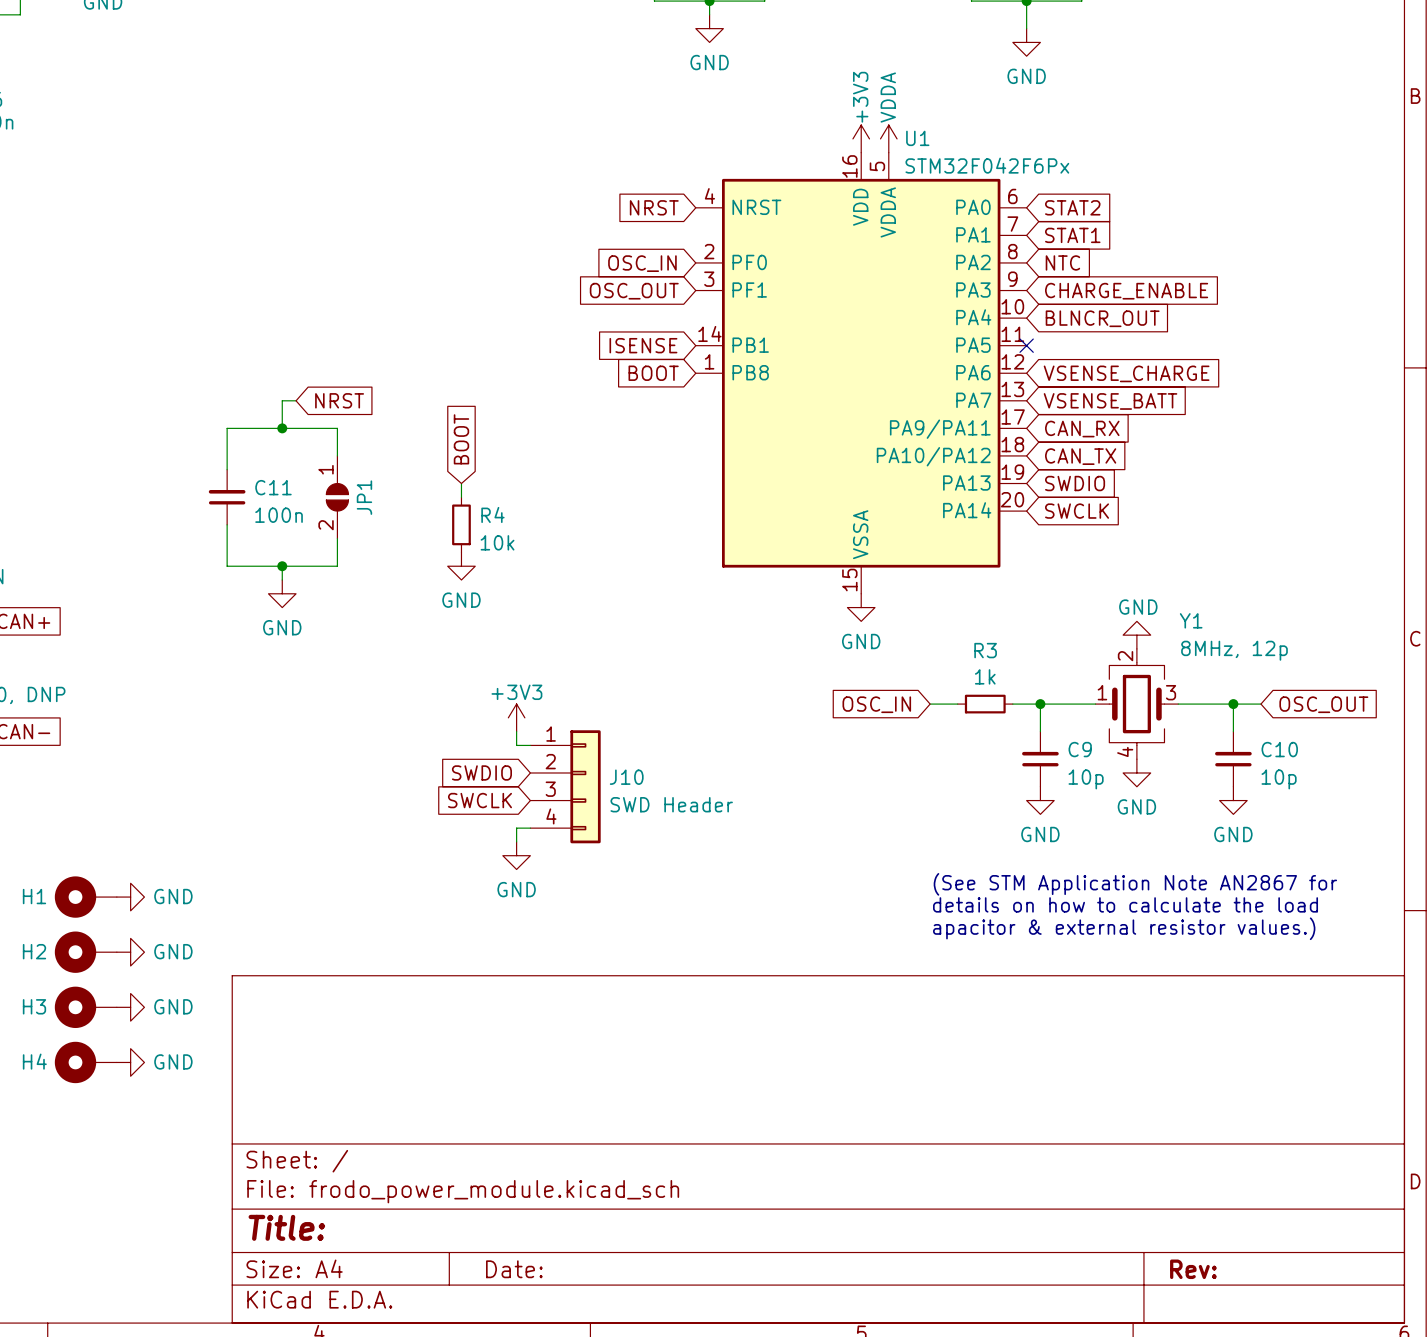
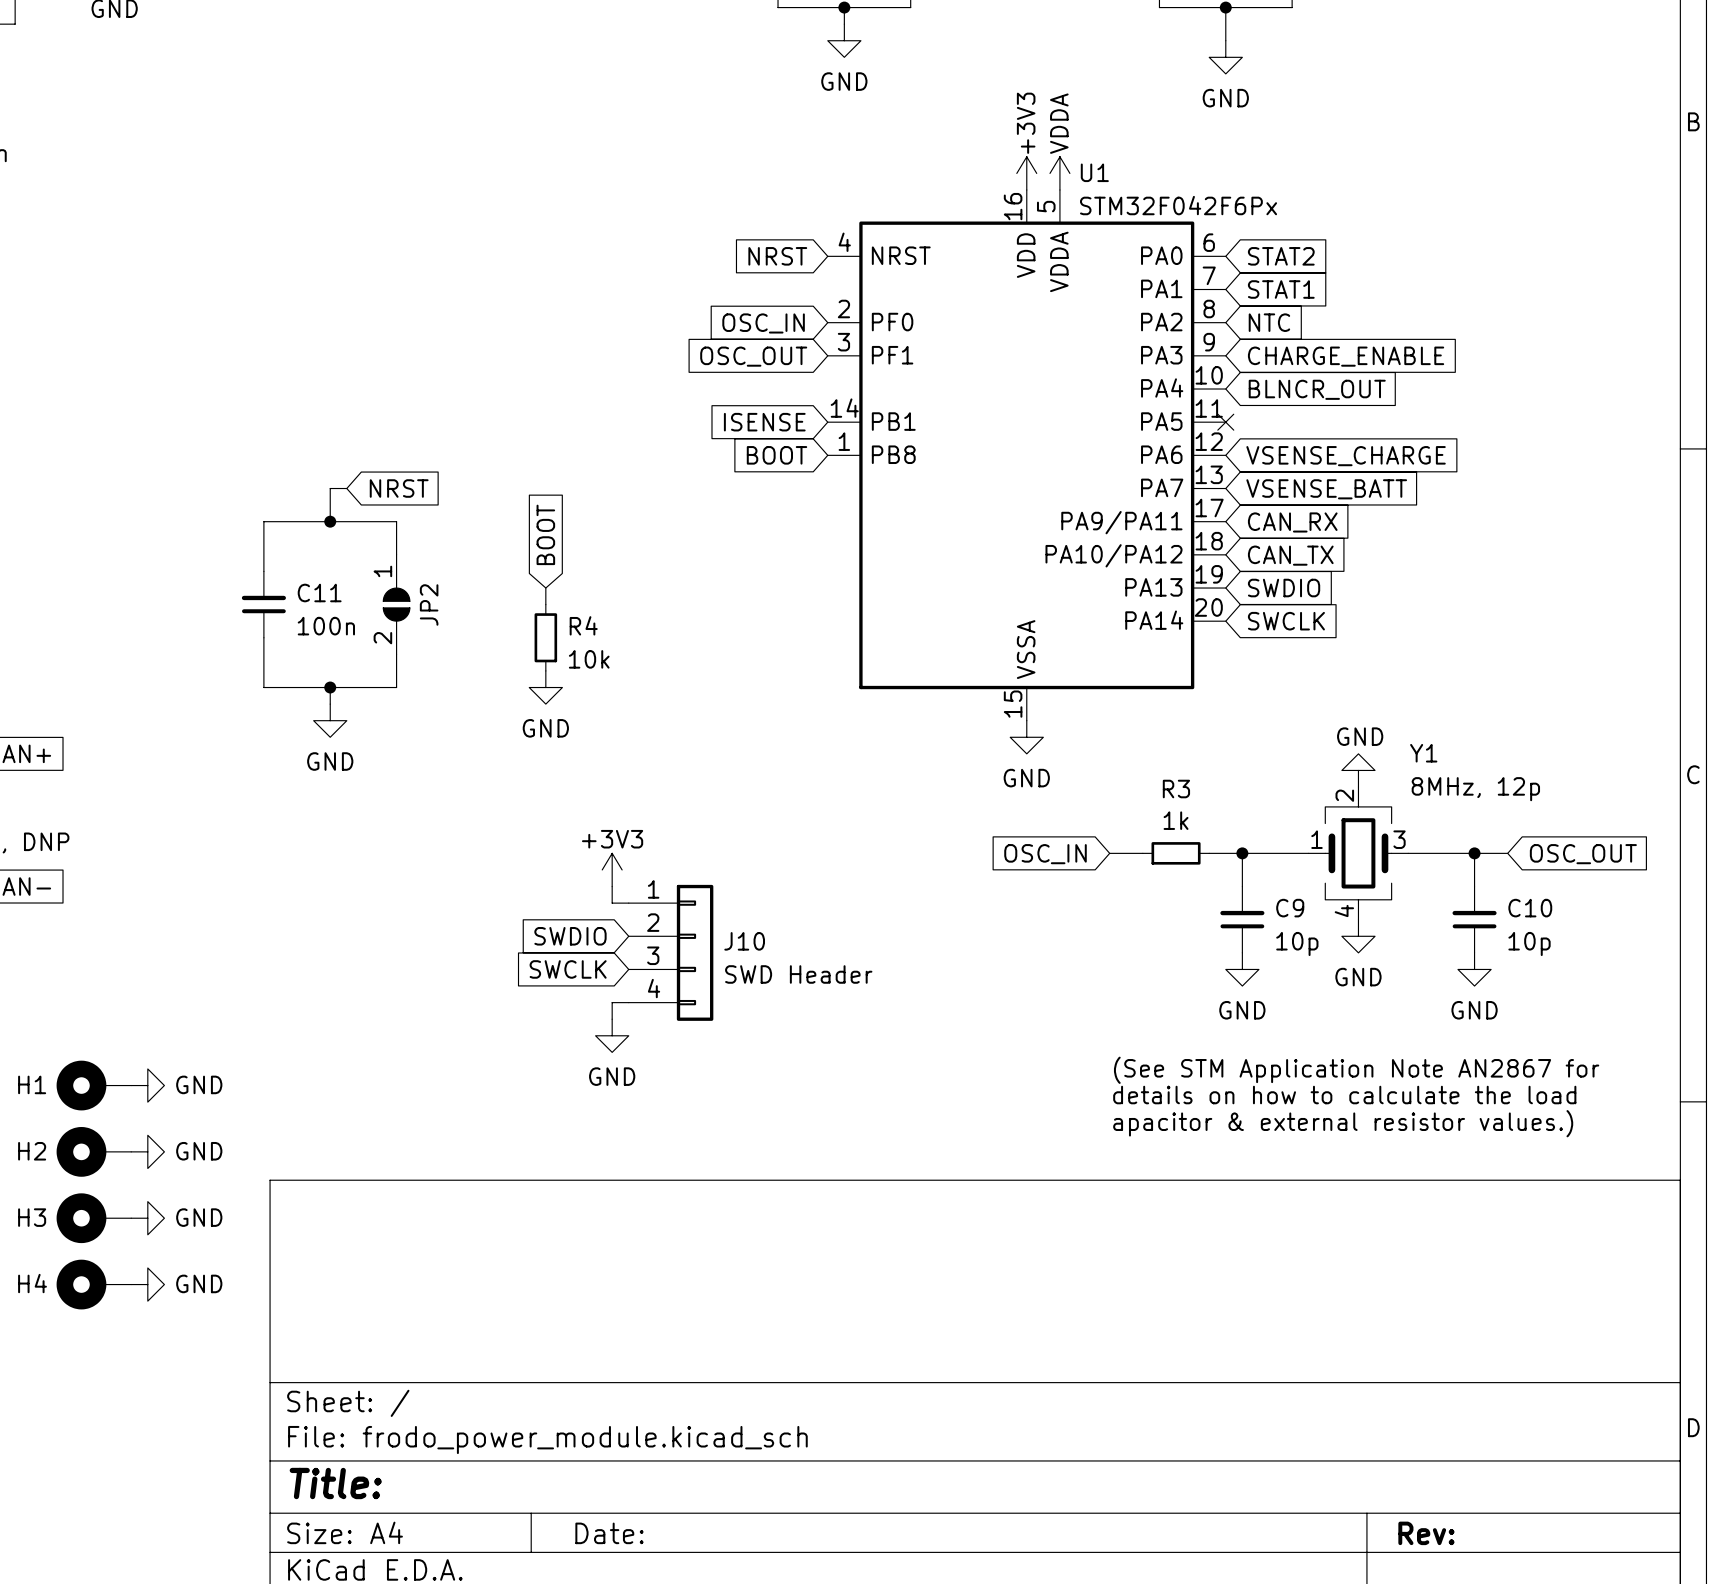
JP1 name: JP1 (364, 497) -> JP2 (429, 604)

